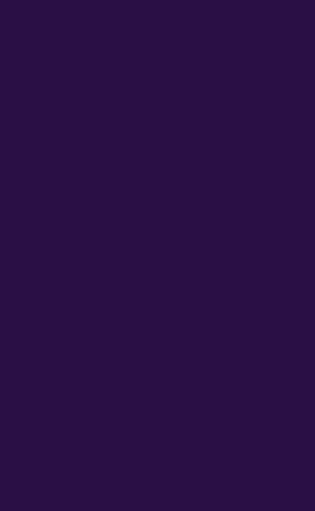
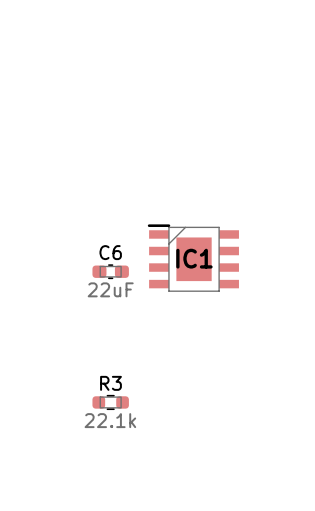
IC1: none -> (193, 258)
C6: none -> 22uF (110, 271)
R3: none -> 22.1k (110, 402)

